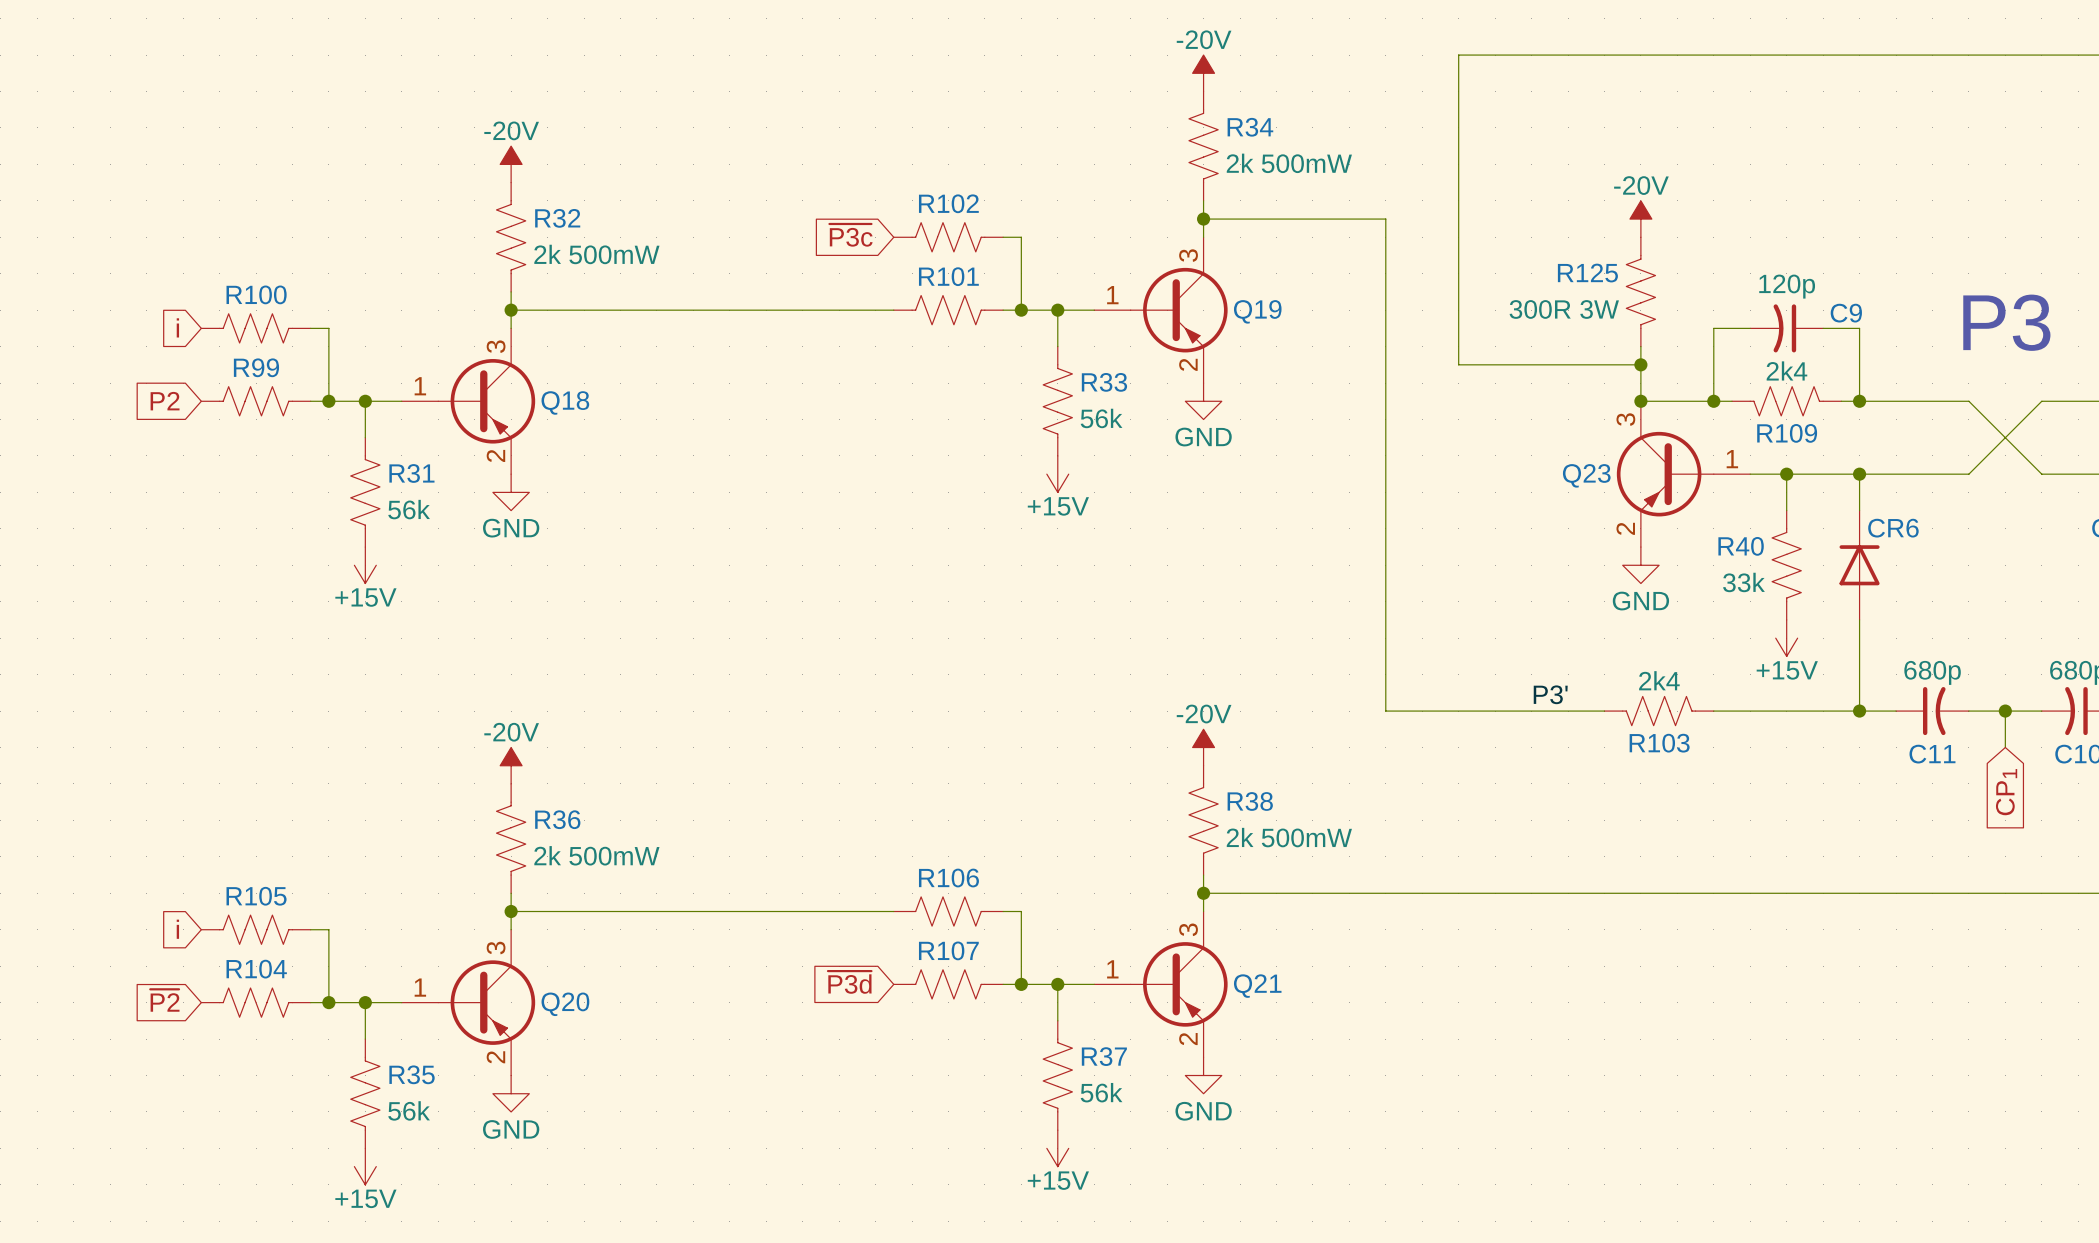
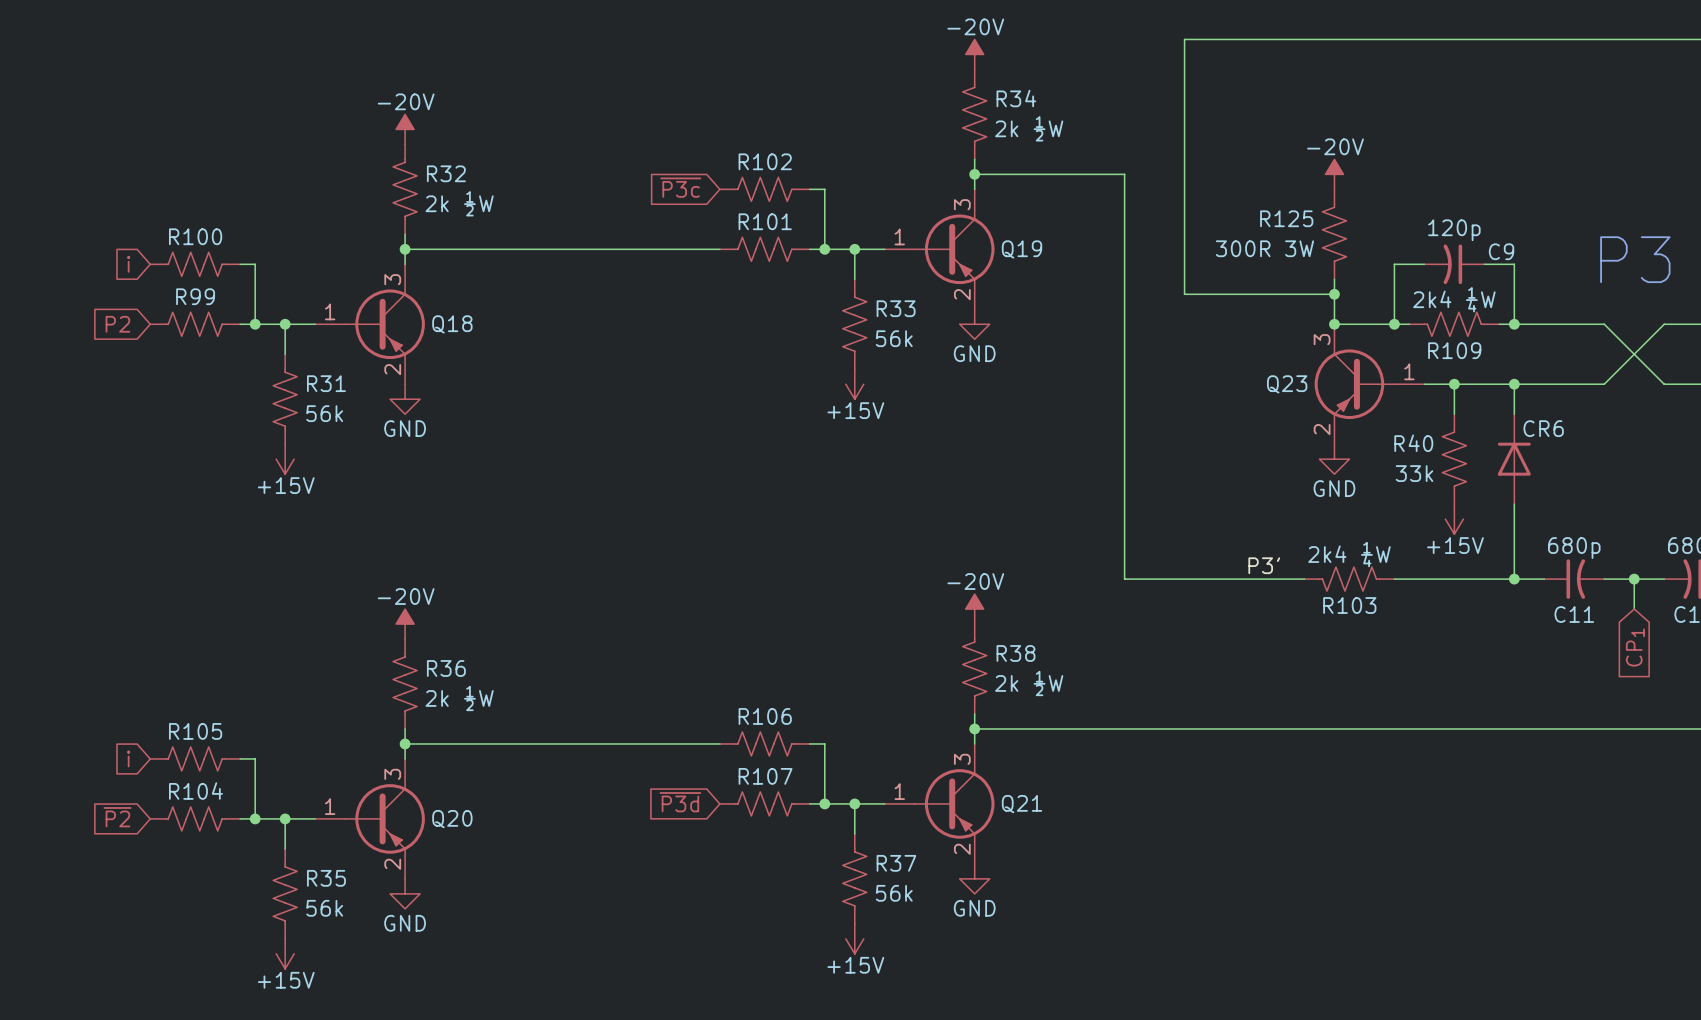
R34 value: 2k 500mW (1289, 163) -> 2k ½W (1029, 128)
R32 value: 2k 500mW (596, 254) -> 2k ½W (459, 203)
R109 value: 2k4 (1786, 370) -> 2k4 ¼W (1454, 299)
R103 value: 2k4 (1659, 680) -> 2k4 ¼W (1349, 554)
R38 value: 2k 500mW (1289, 837) -> 2k ½W (1029, 683)
R36 value: 2k 500mW (596, 855) -> 2k ½W (459, 698)

